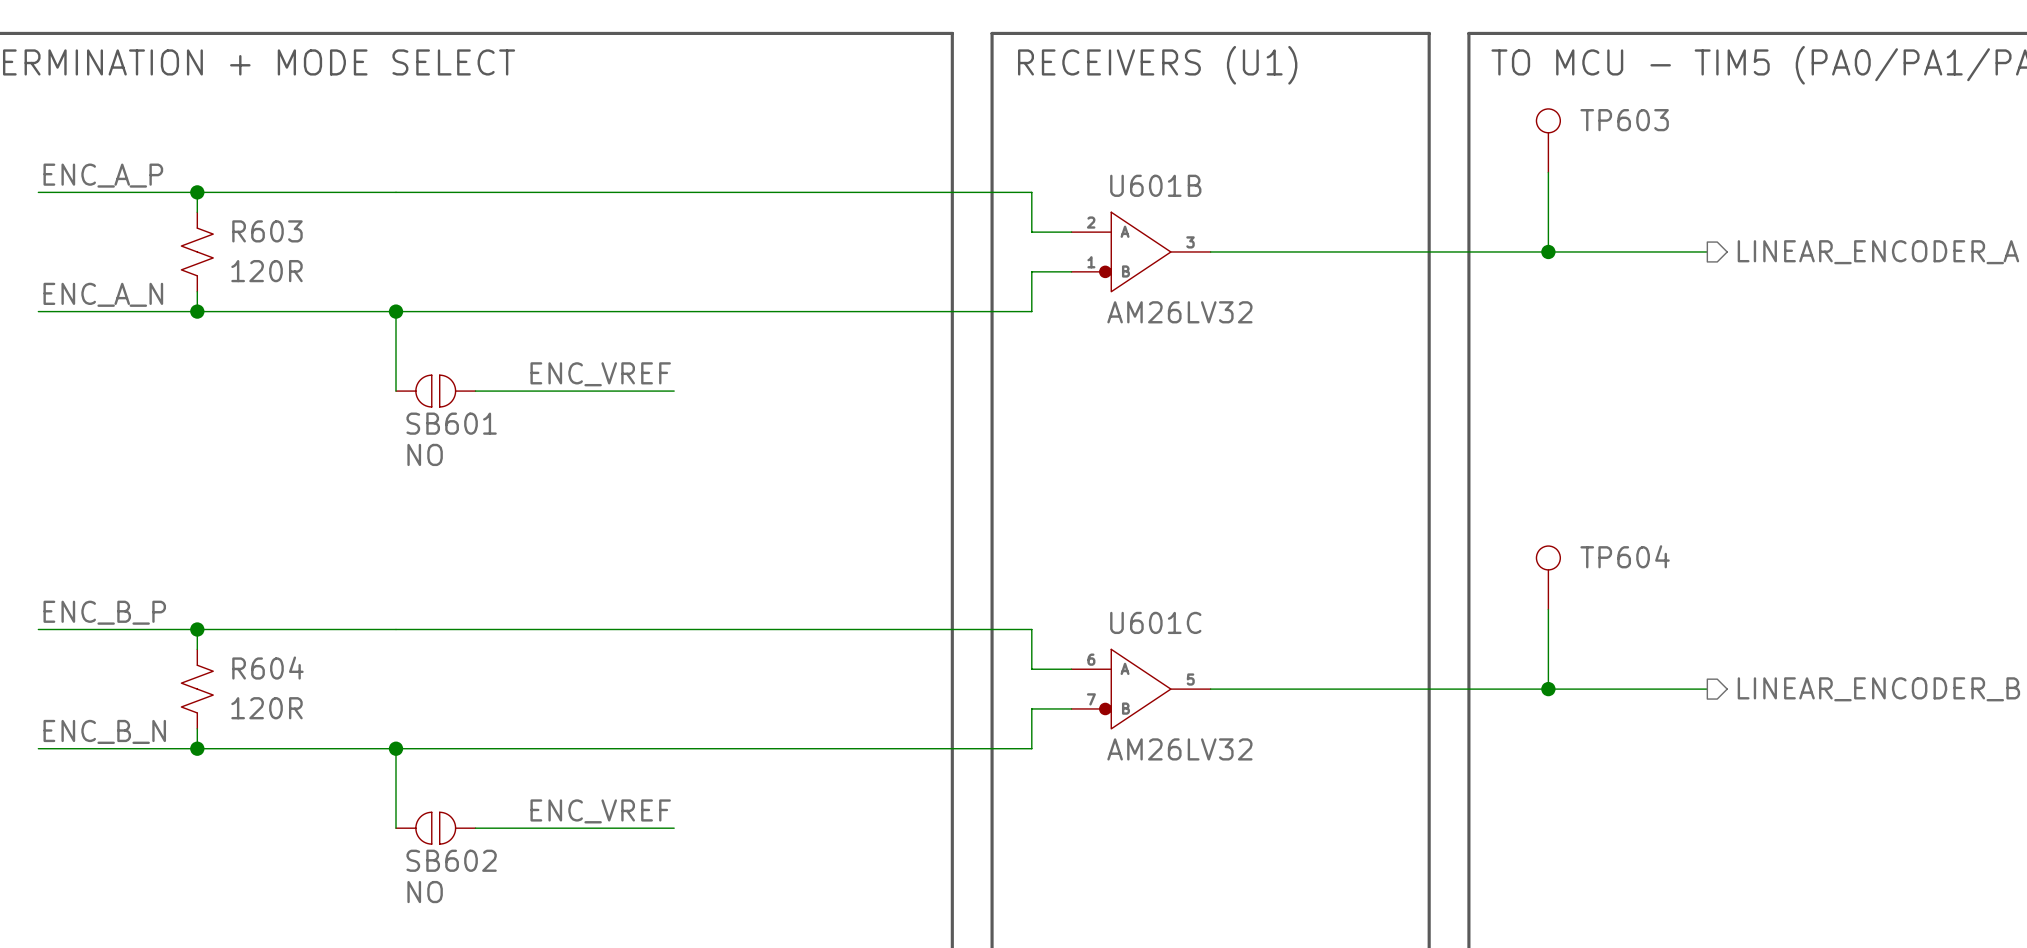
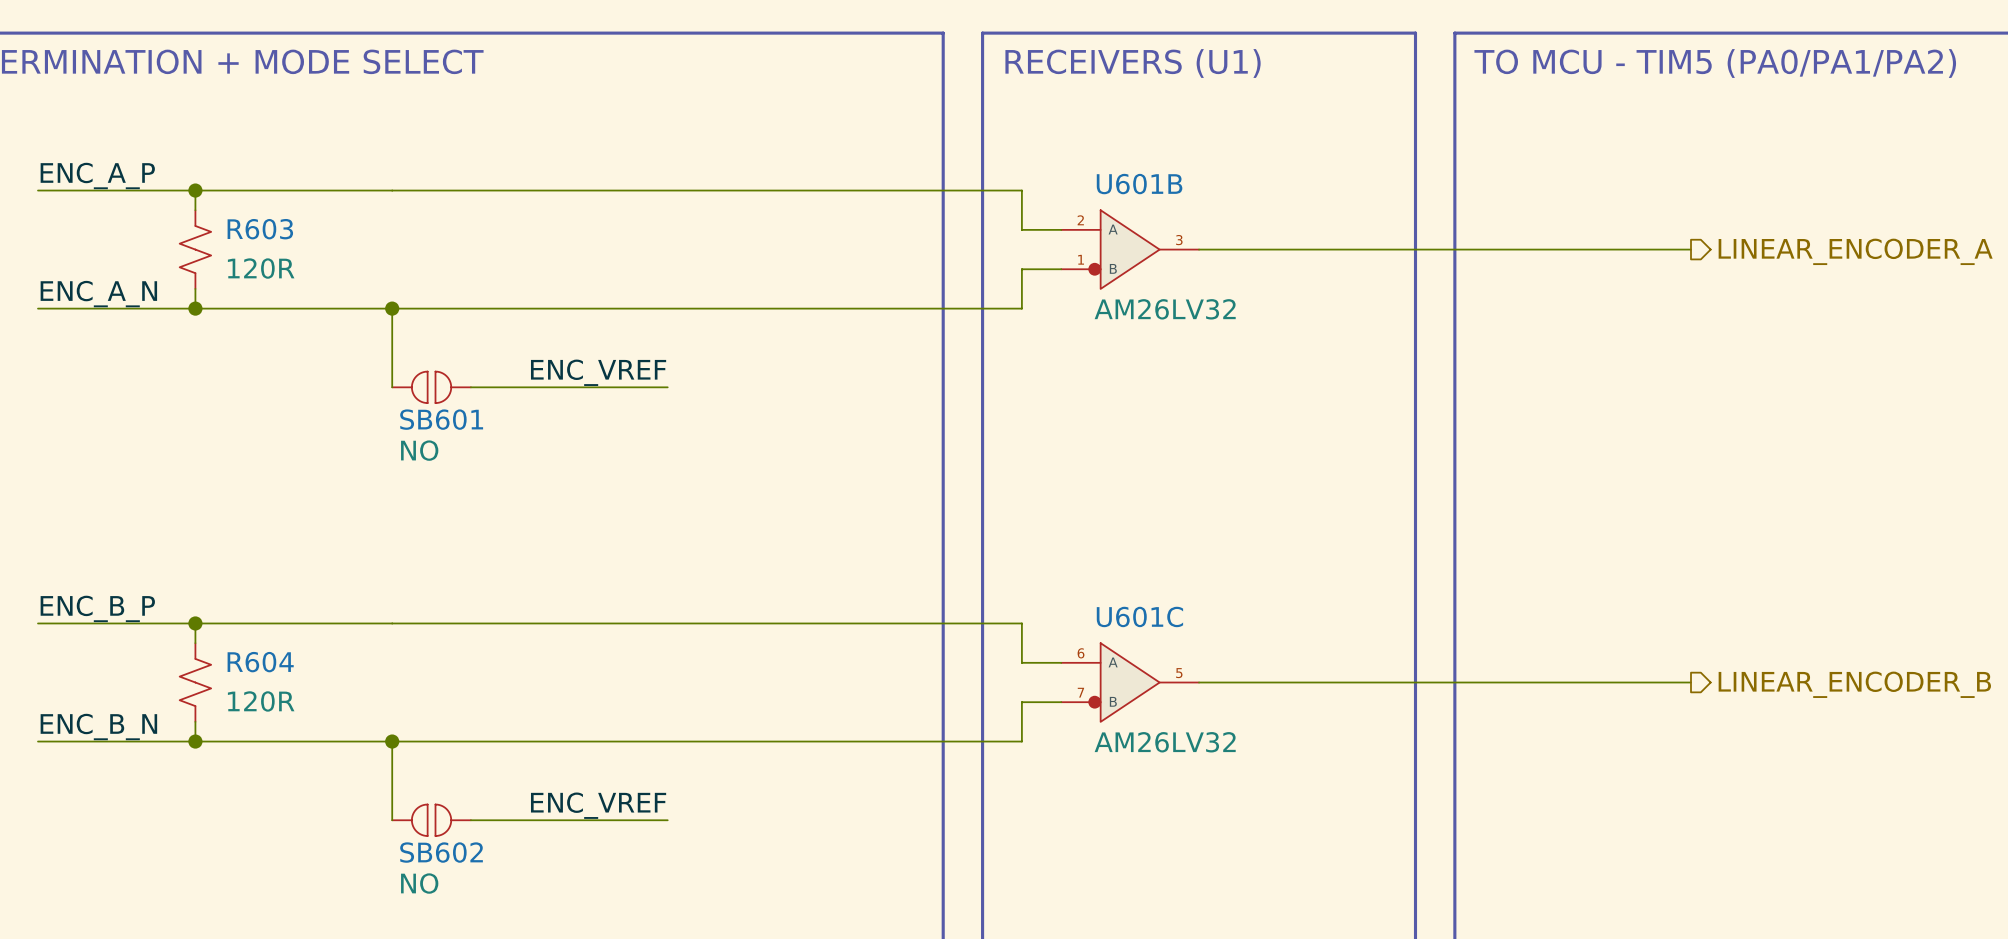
TP603: (1548, 140) -> none
wire: (1548, 172) (1548, 251) -> none
junction: (1548, 251) -> none
TP604: (1548, 577) -> none
wire: (1548, 609) (1548, 689) -> none
junction: (1548, 689) -> none

